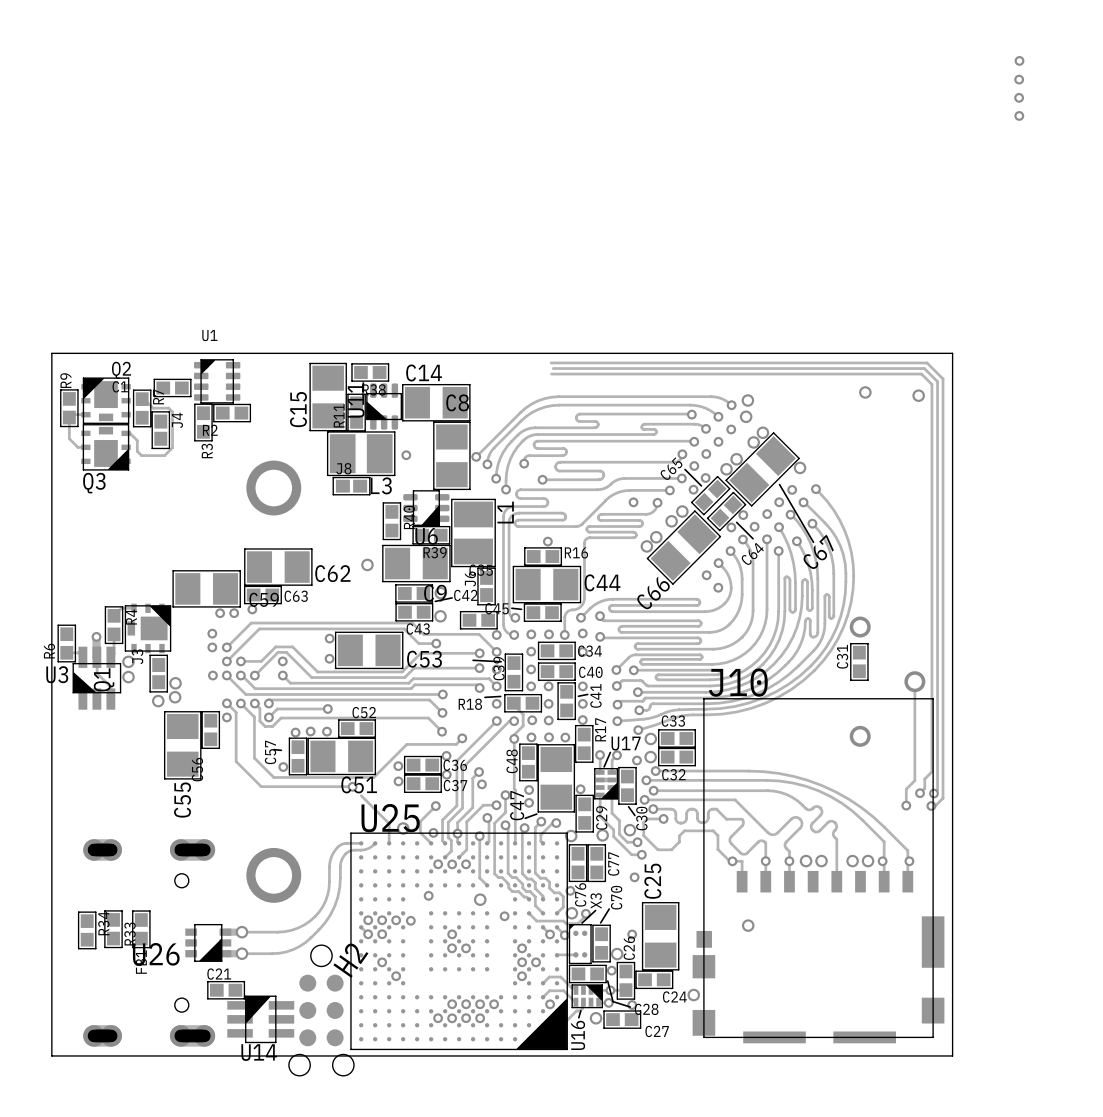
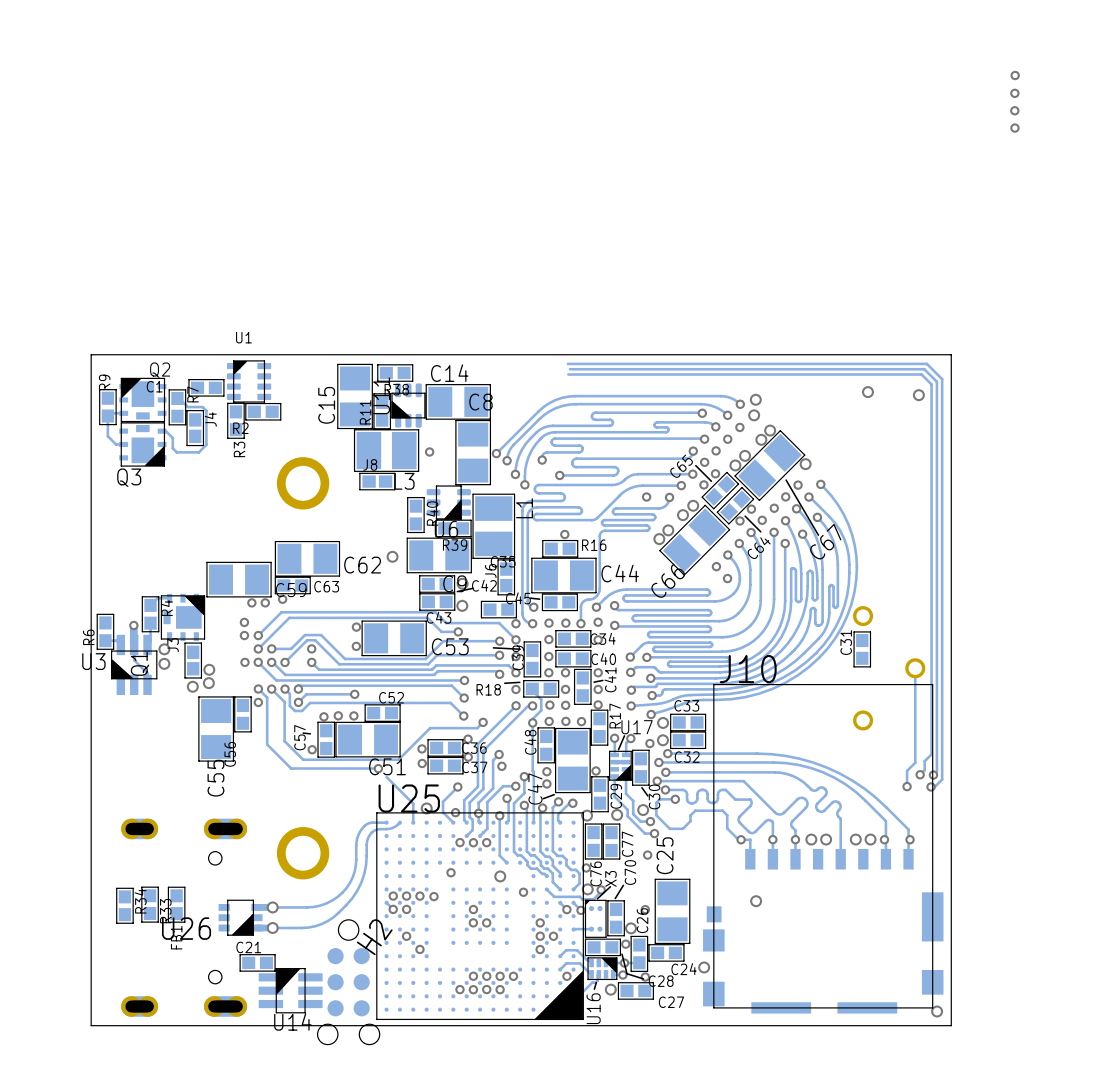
via: none -> (937, 1011)

